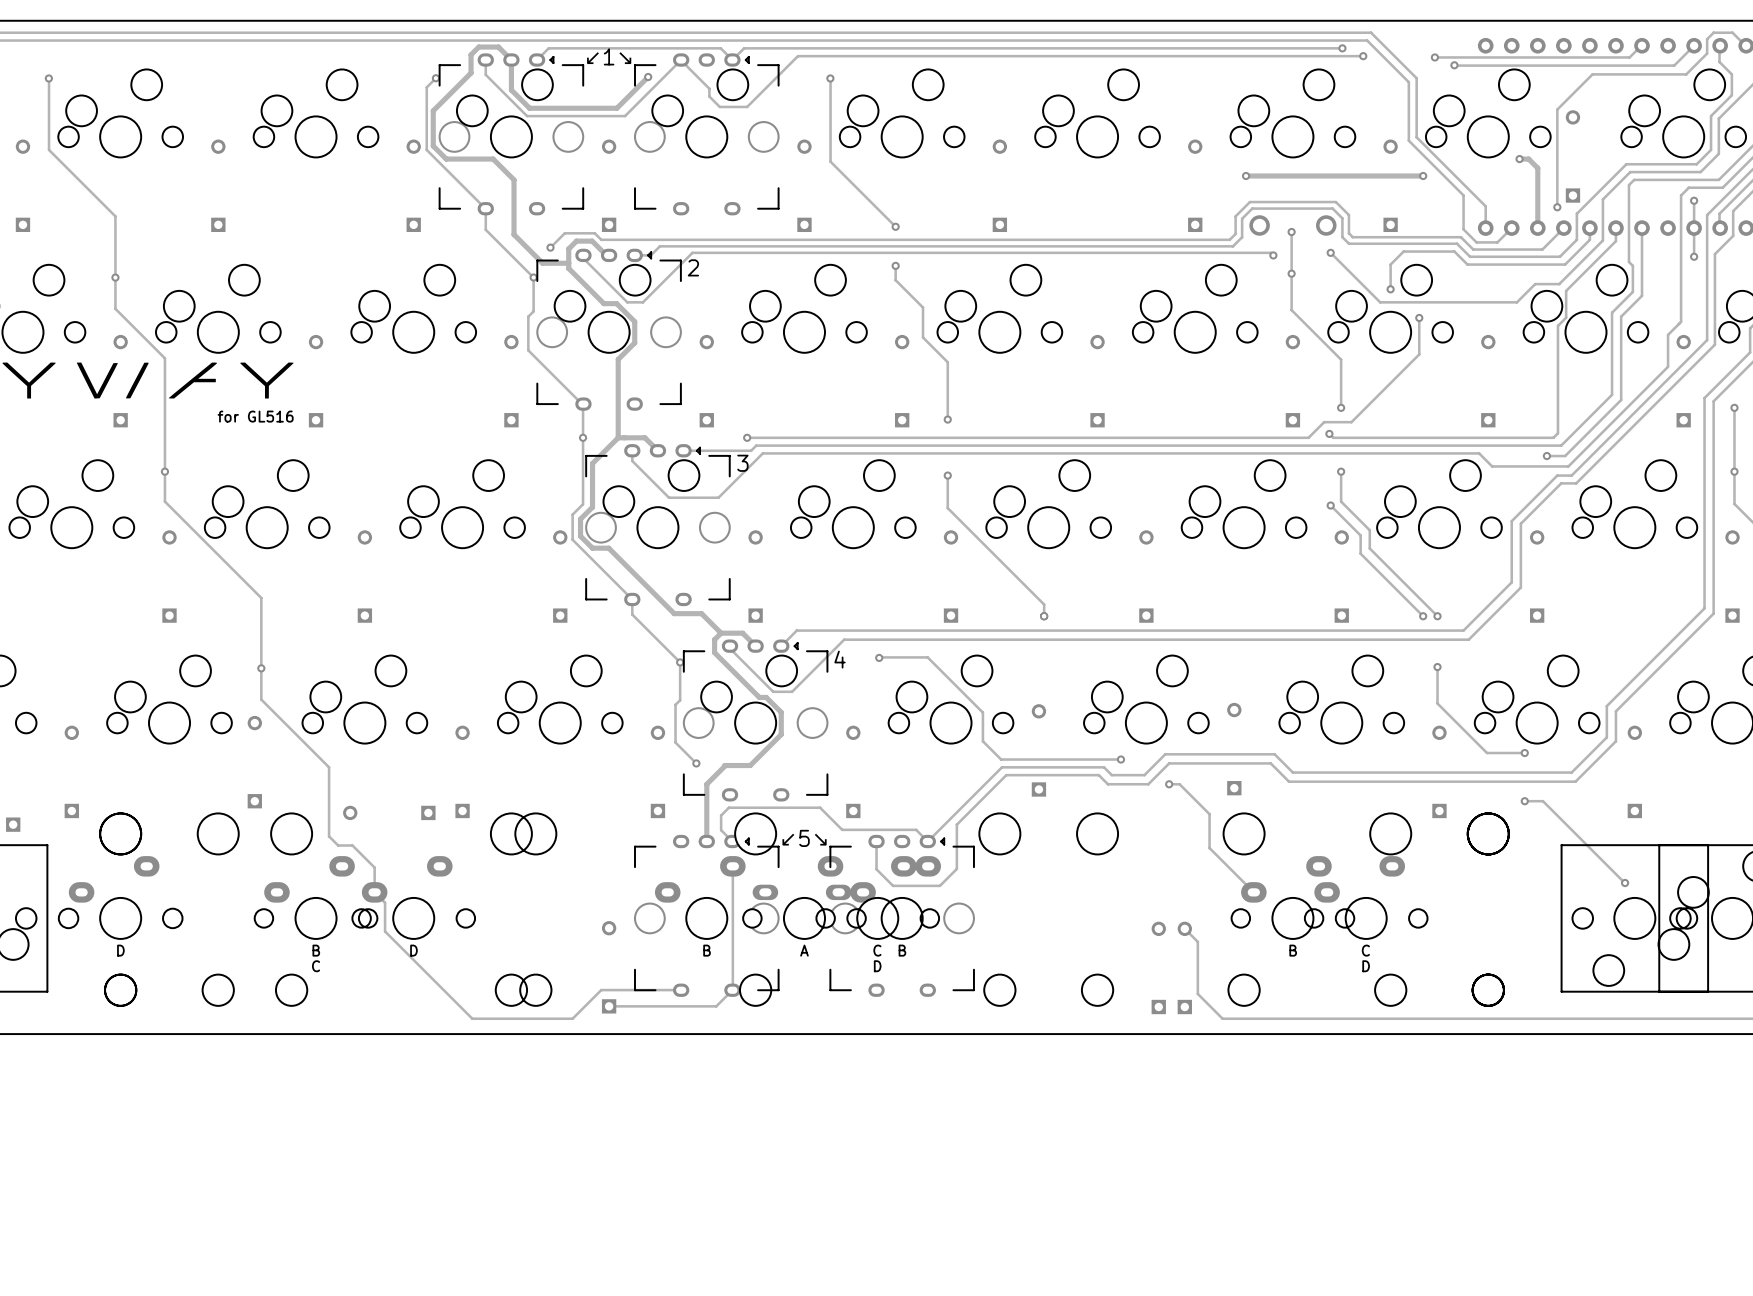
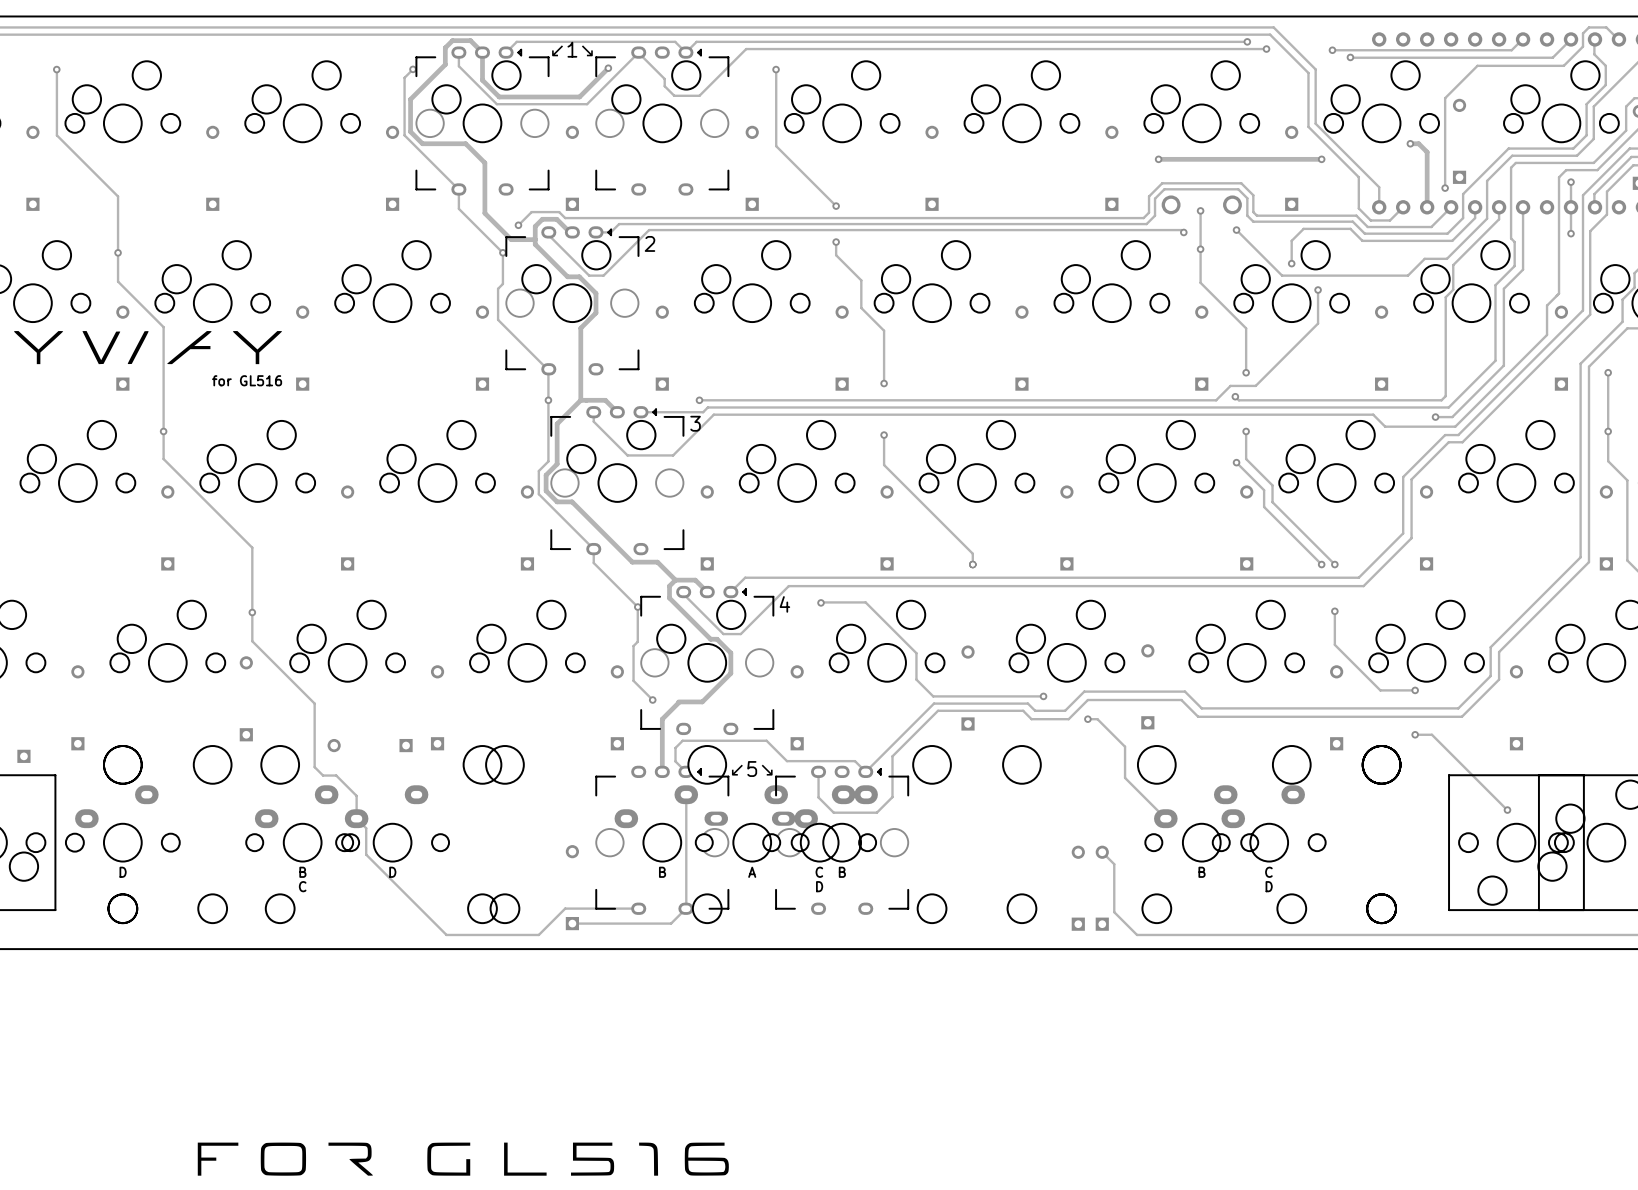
drawing: none -> [197, 1142, 729, 1176]

